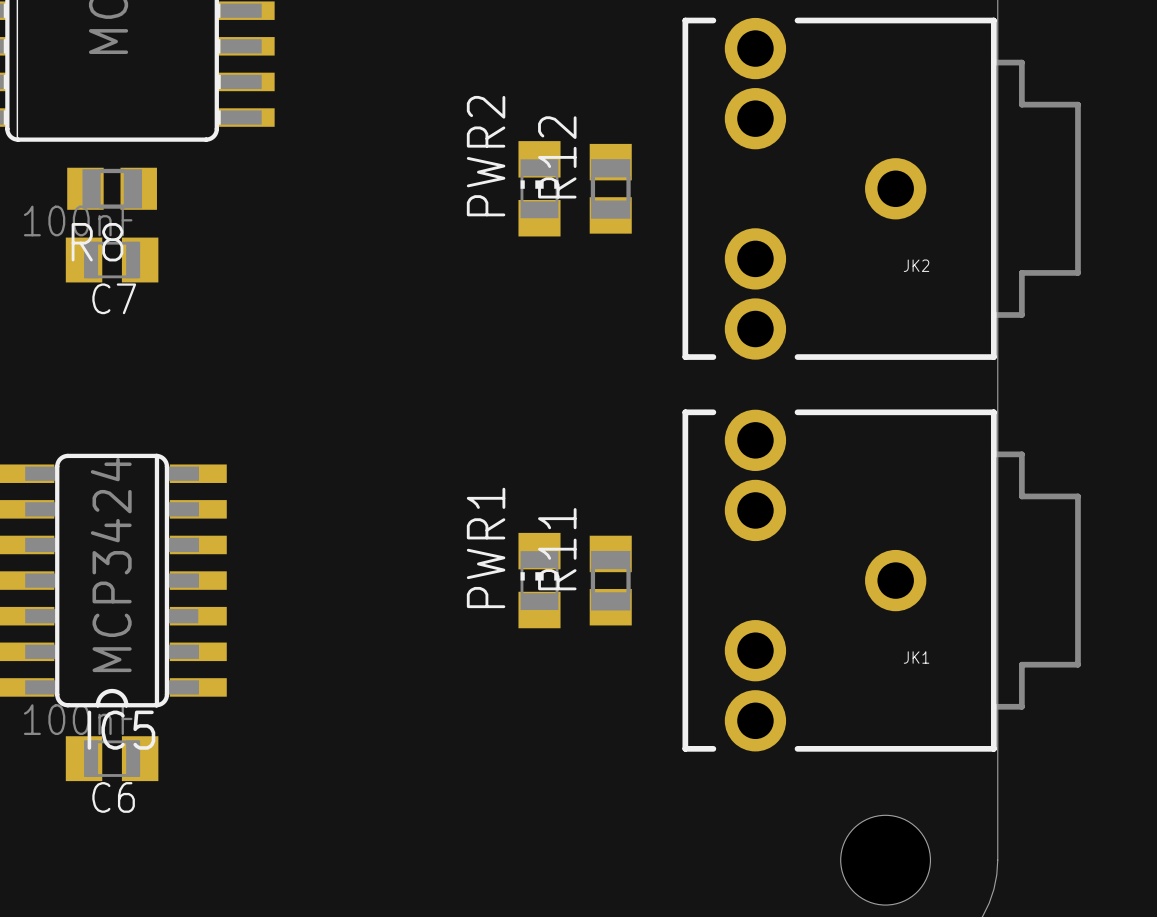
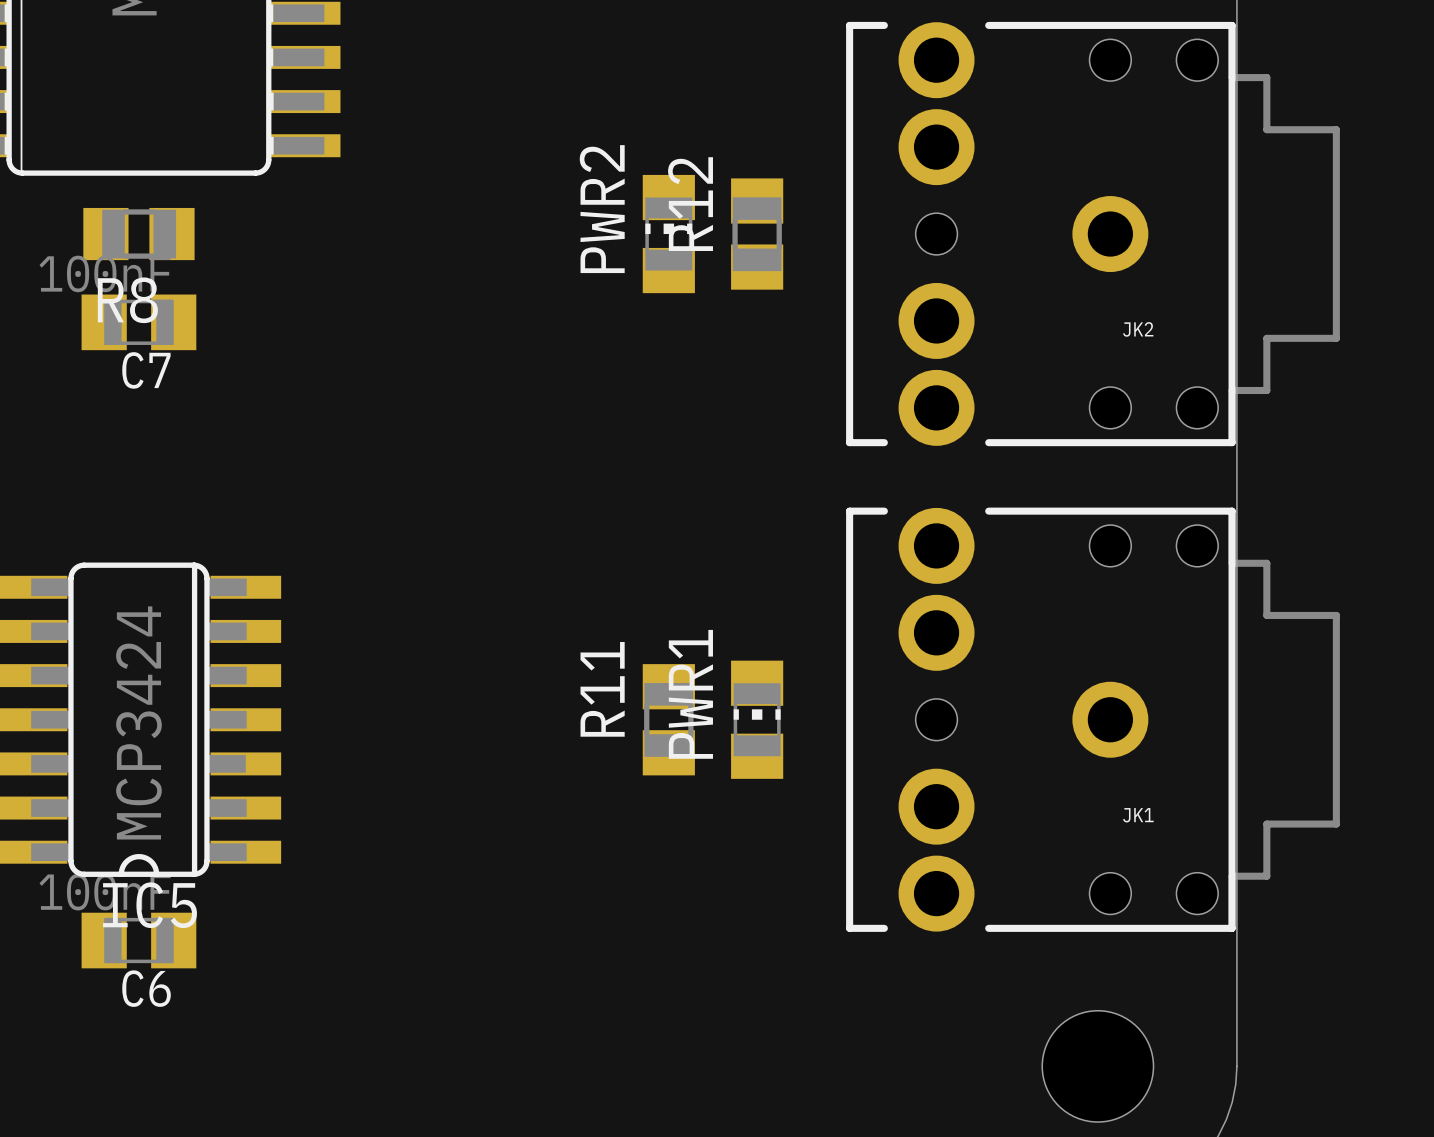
JK2 footprint: [682, 17, 1081, 360] -> [846, 21, 1340, 447]
JK1 footprint: [682, 409, 1081, 752] -> [846, 507, 1340, 932]
PWR1 position: (539, 580) -> (757, 719)
R11 position: (610, 580) -> (668, 719)

